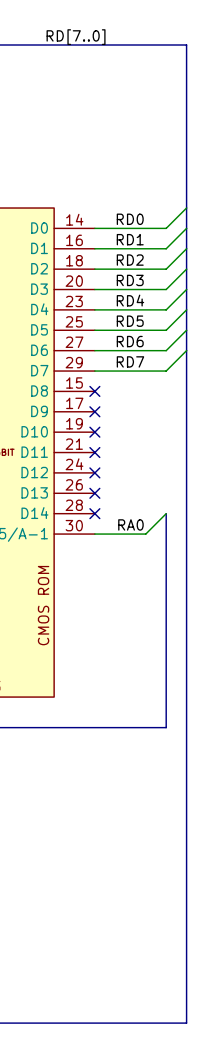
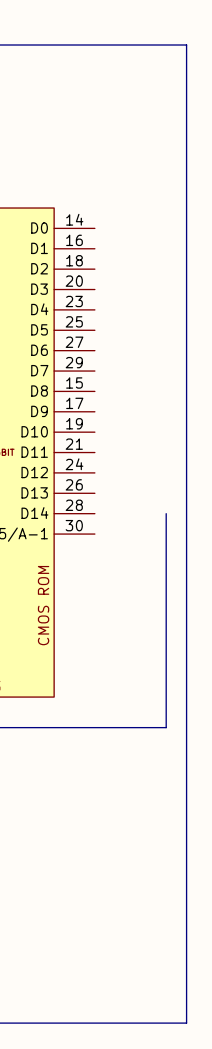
label: RD[7..0] (76, 37) -> none
wire: (186, 208) (166, 228) (94, 228) -> none
label: RD0 (130, 219) -> none
wire: (186, 228) (166, 248) (94, 248) -> none
label: RD1 (130, 239) -> none
wire: (186, 248) (166, 269) (94, 269) -> none
label: RD2 (130, 260) -> none
wire: (186, 269) (166, 289) (94, 289) -> none
label: RD3 (130, 280) -> none
wire: (186, 289) (166, 309) (94, 309) -> none
label: RD4 (130, 300) -> none
wire: (186, 309) (166, 330) (94, 330) -> none
label: RD5 (130, 321) -> none
wire: (186, 330) (166, 350) (94, 350) -> none
label: RD6 (130, 341) -> none
wire: (186, 350) (166, 371) (94, 371) -> none
label: RD7 (130, 361) -> none
no-connect mark: (94, 391) -> none
no-connect mark: (94, 411) -> none
no-connect mark: (94, 432) -> none
no-connect mark: (94, 452) -> none
no-connect mark: (94, 472) -> none
no-connect mark: (94, 493) -> none
no-connect mark: (94, 513) -> none
wire: (166, 513) (145, 534) (94, 534) -> none
label: RA0 (130, 524) -> none

